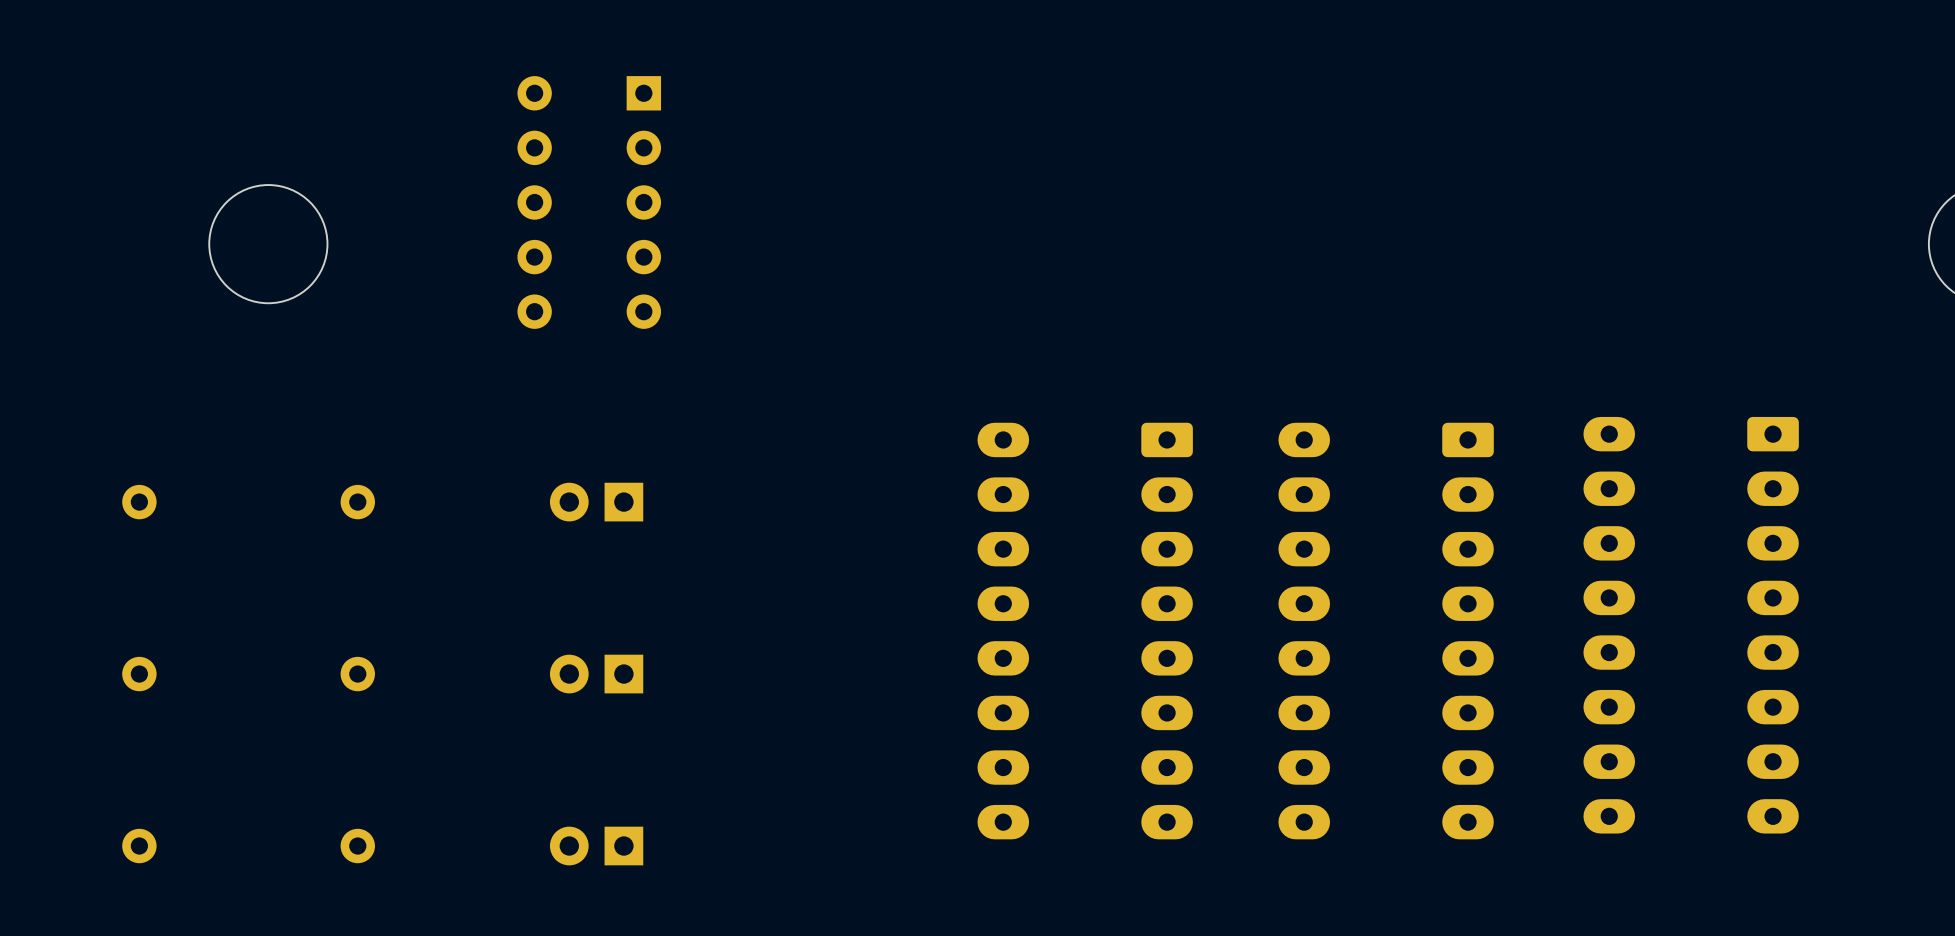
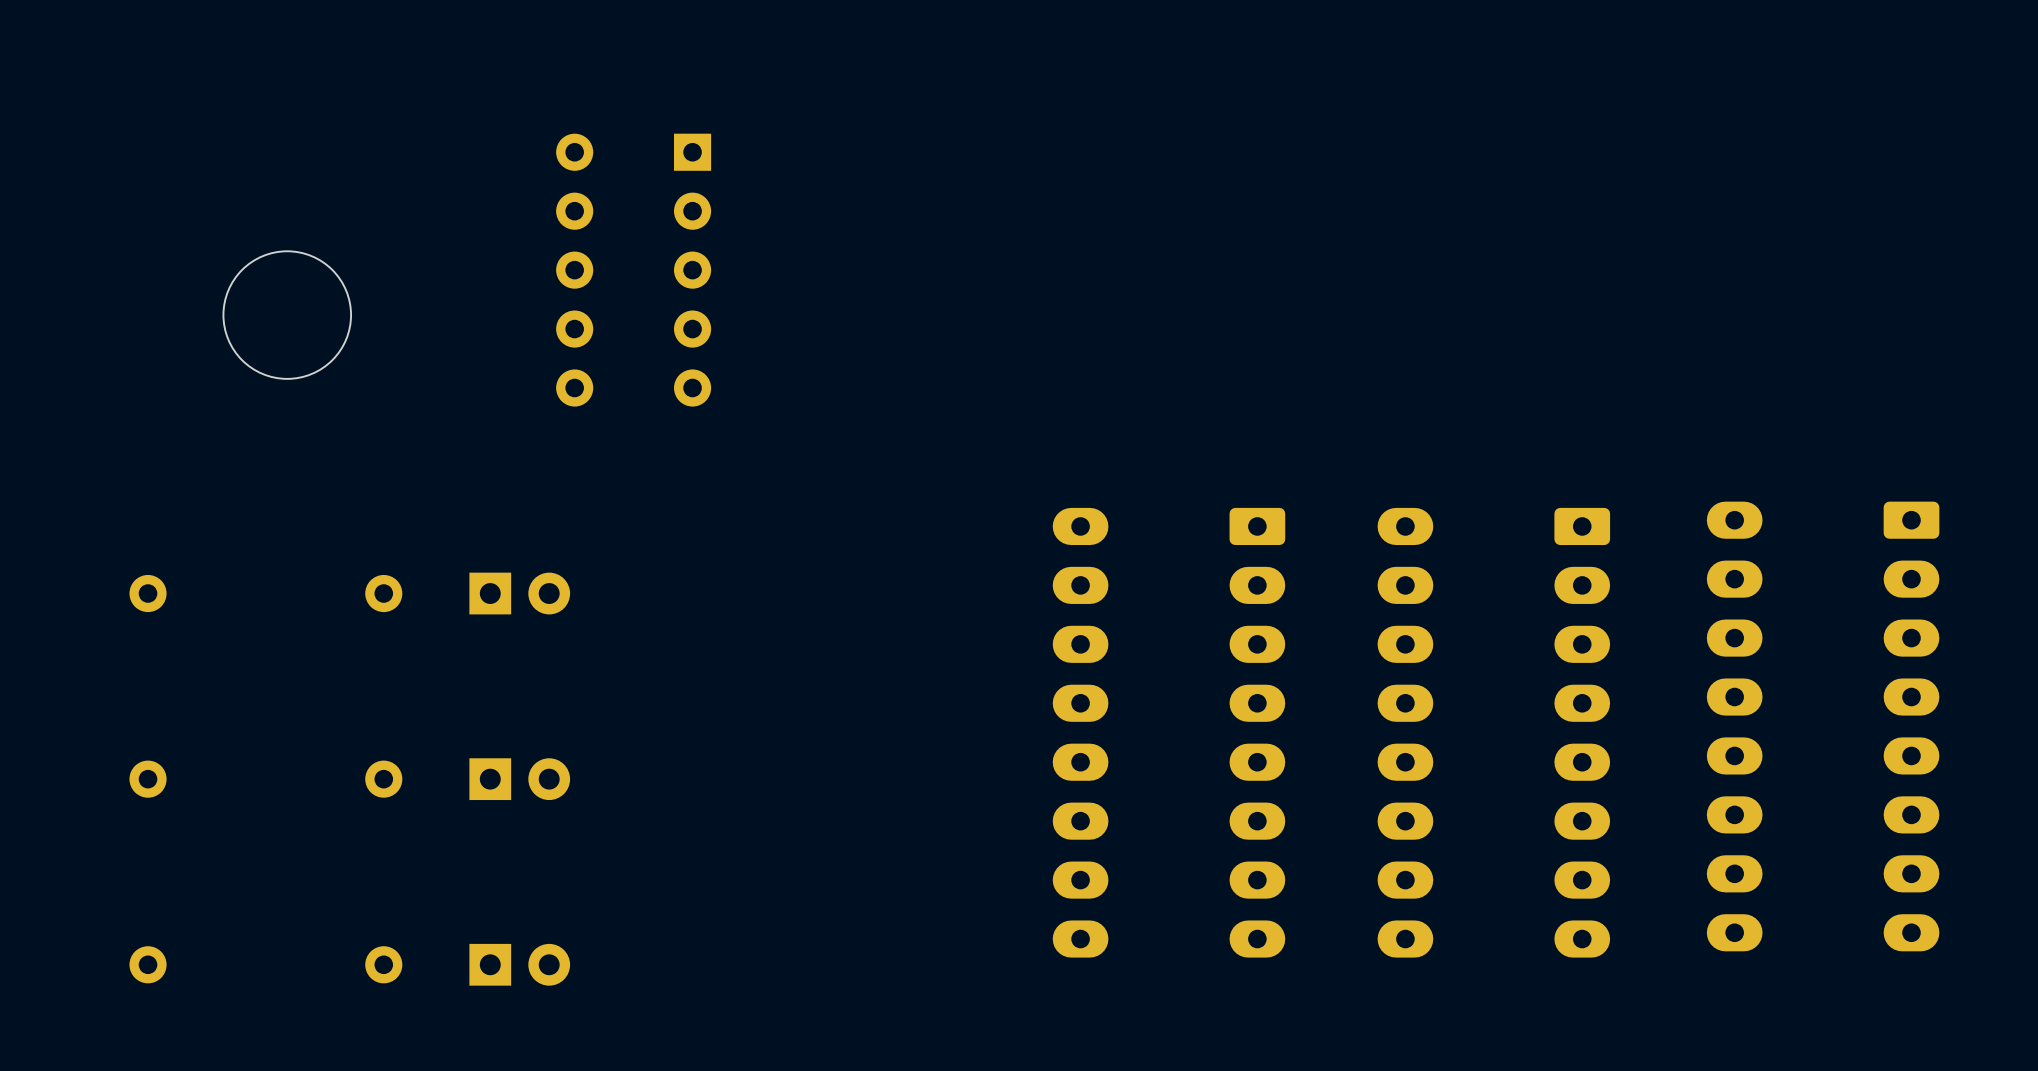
part: none -> (519, 593)
part: (596, 502) -> none
part: none -> (519, 779)
part: (596, 674) -> none
part: none -> (519, 964)
part: (596, 846) -> none

